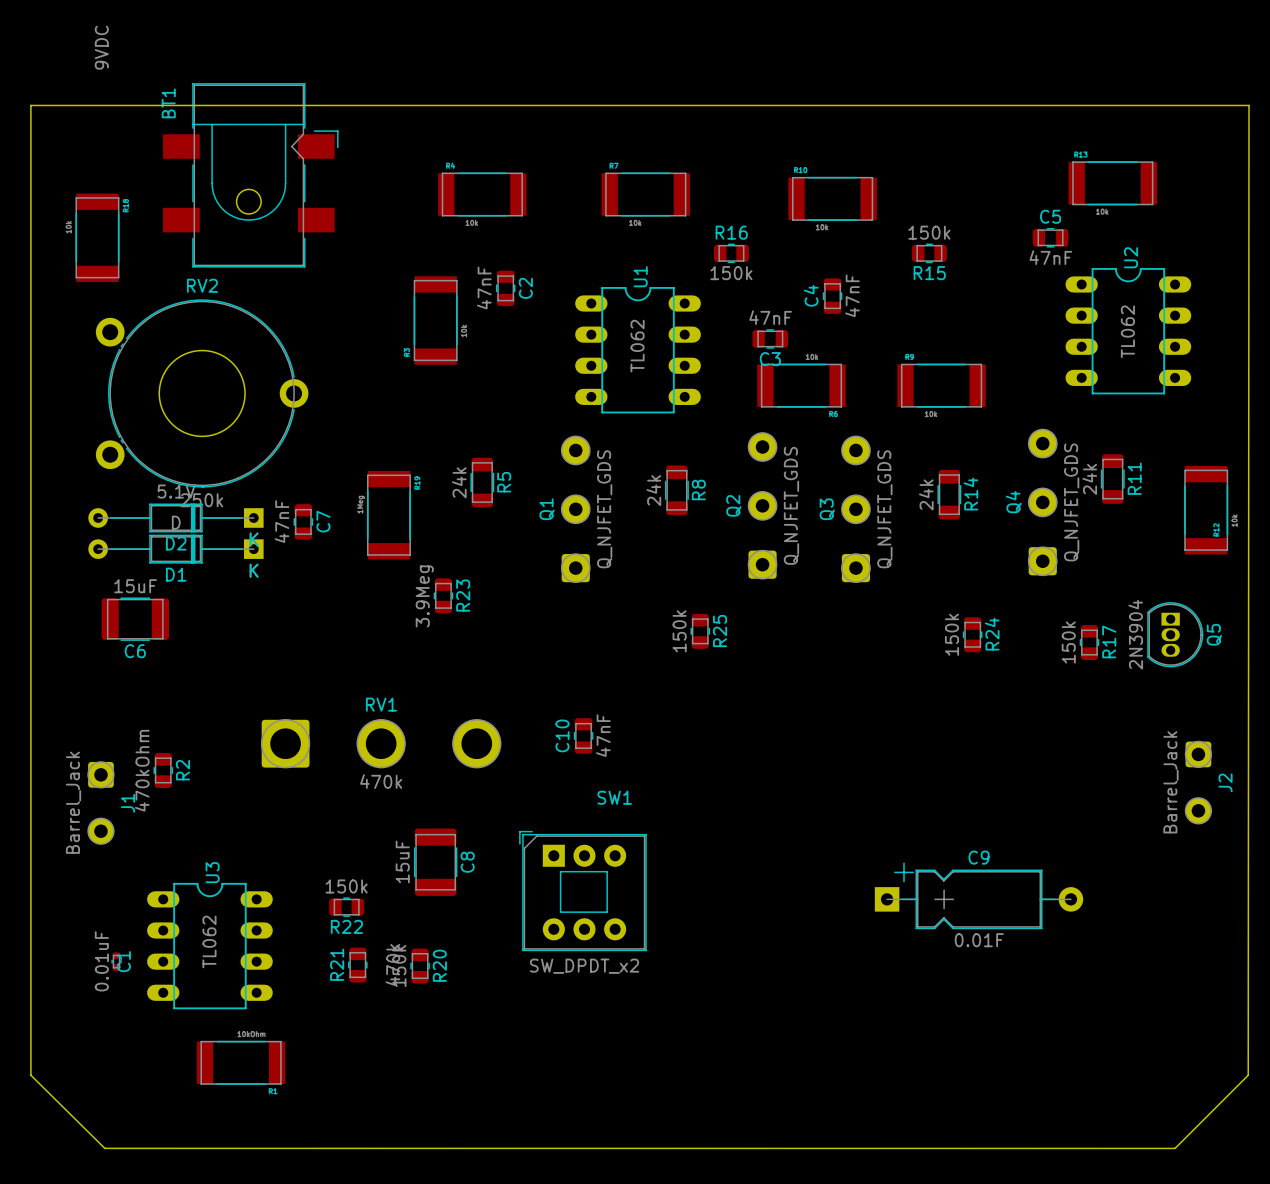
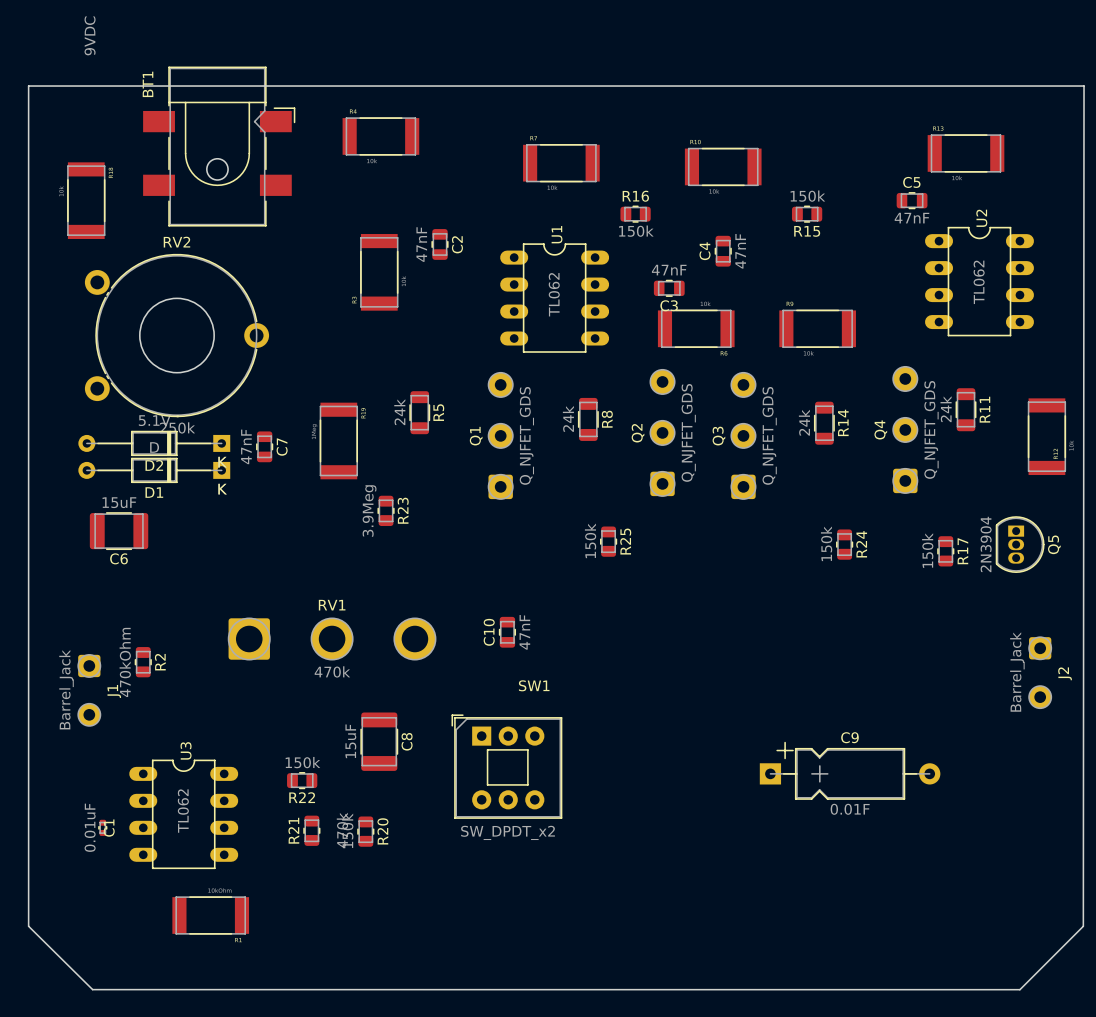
part position: (482, 194) -> (380, 136)

